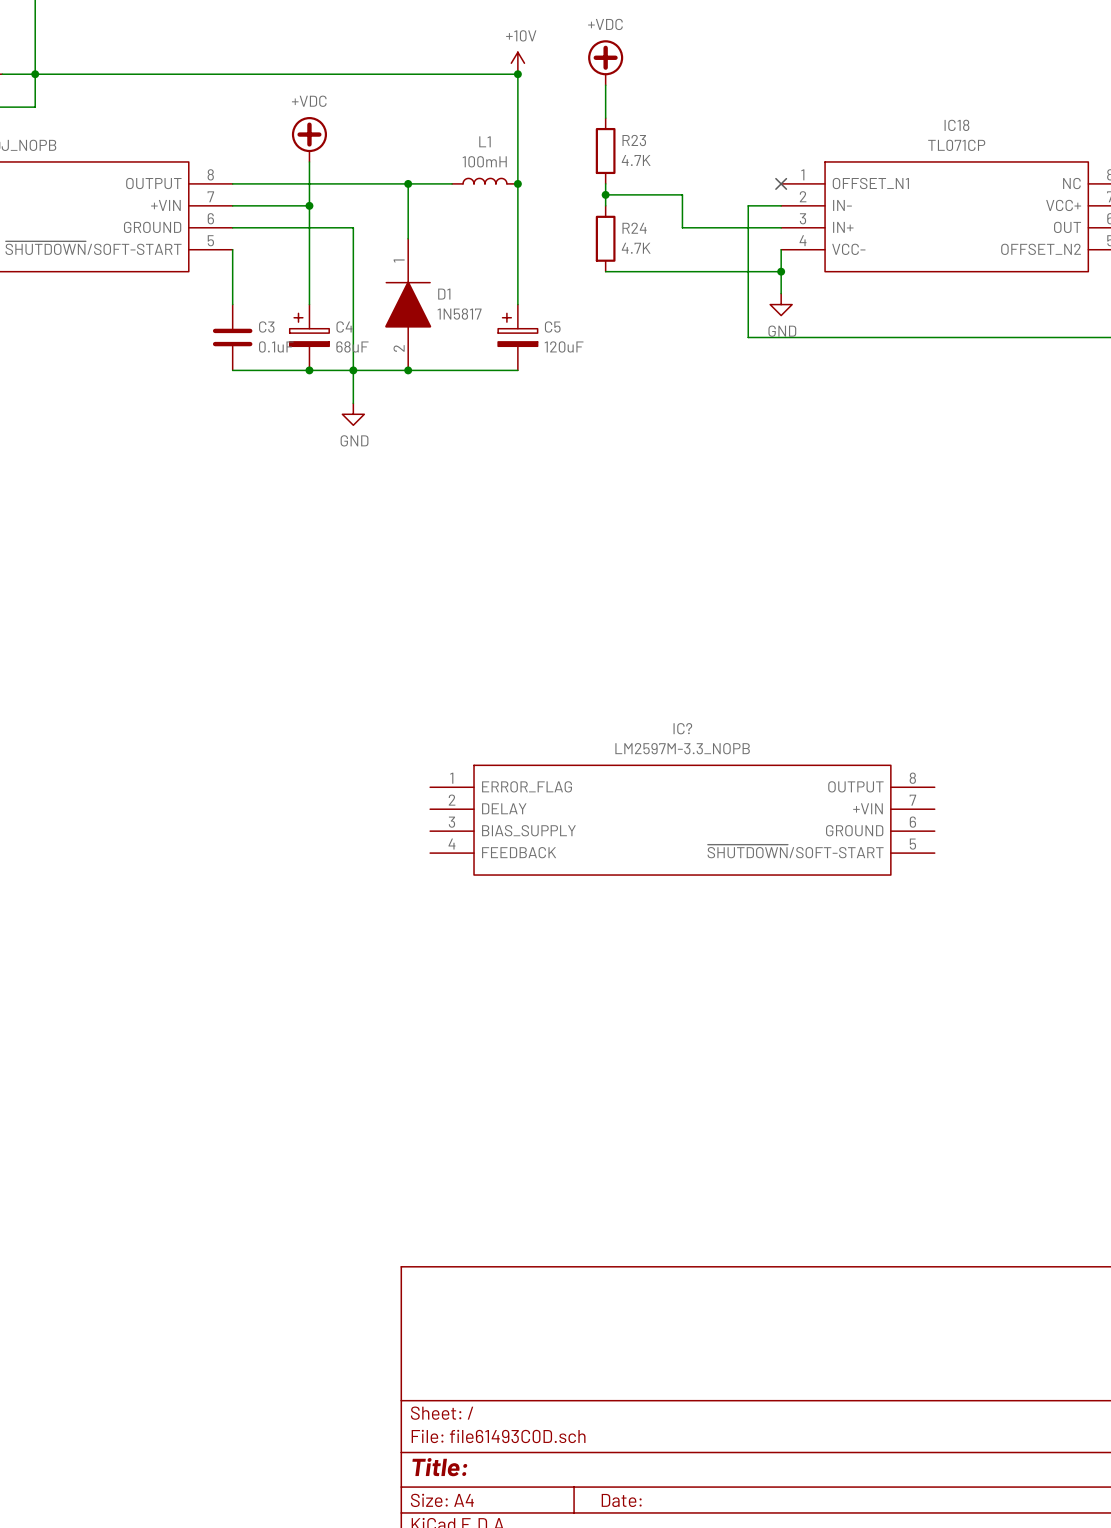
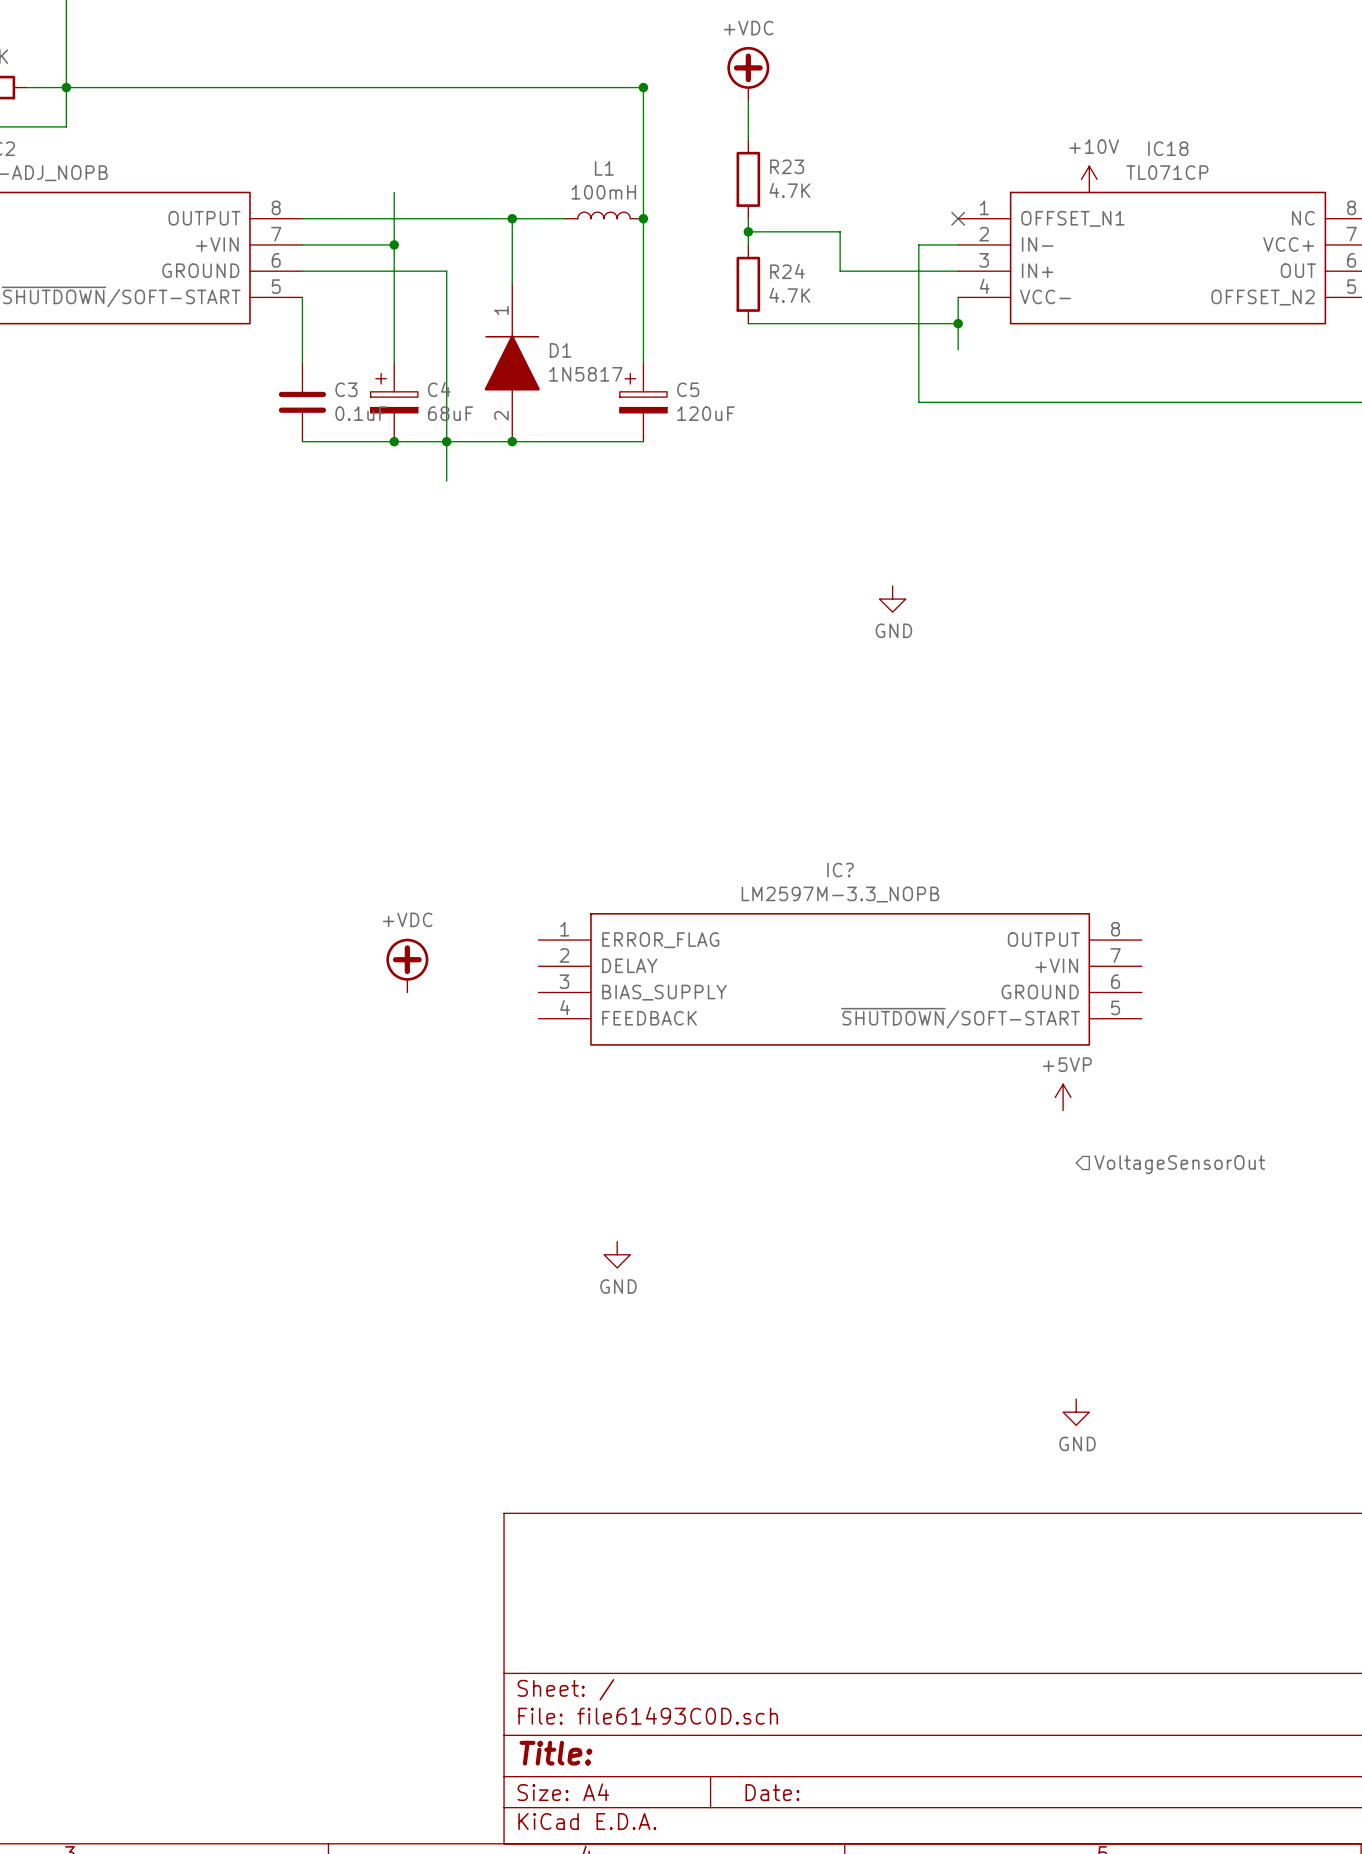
power symbol: +10V (517, 63) -> none
power symbol: +VDC (309, 139) -> none
power symbol: none -> +10V (1089, 179)
power symbol: GND (781, 304) -> none
power symbol: GND (353, 414) -> none
power symbol: none -> GND (892, 599)
power symbol: none -> +VDC (407, 965)
power symbol: none -> +5VP (1063, 1097)
hierarchical label: none -> VoltageSensorOut (1179, 1164)
power symbol: none -> GND (617, 1254)
power symbol: none -> GND (1076, 1412)

